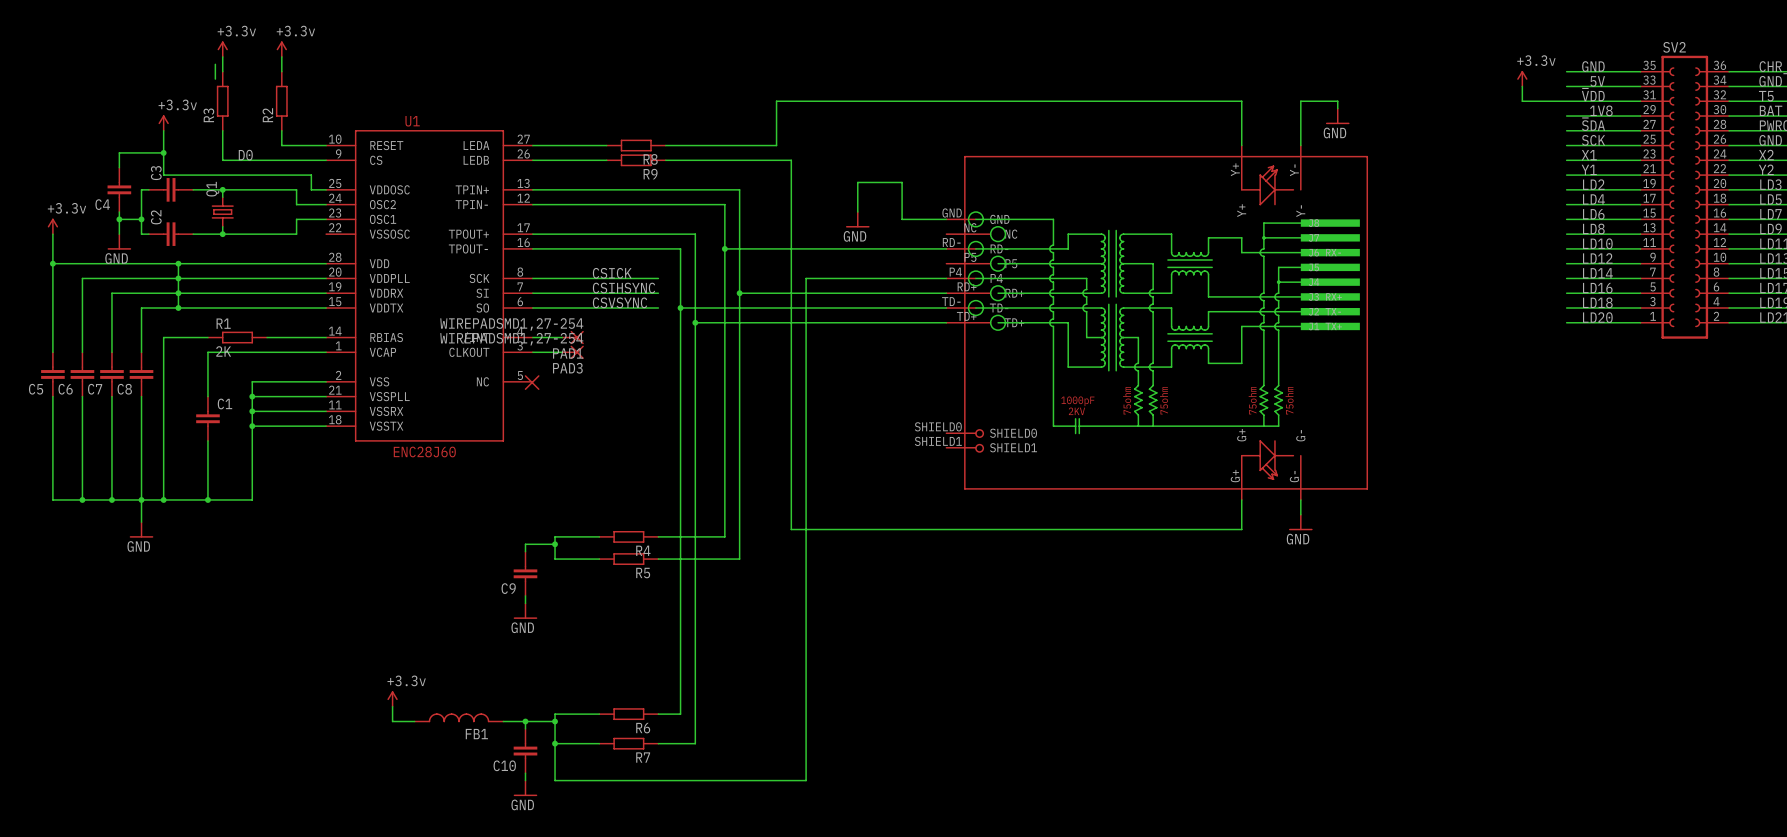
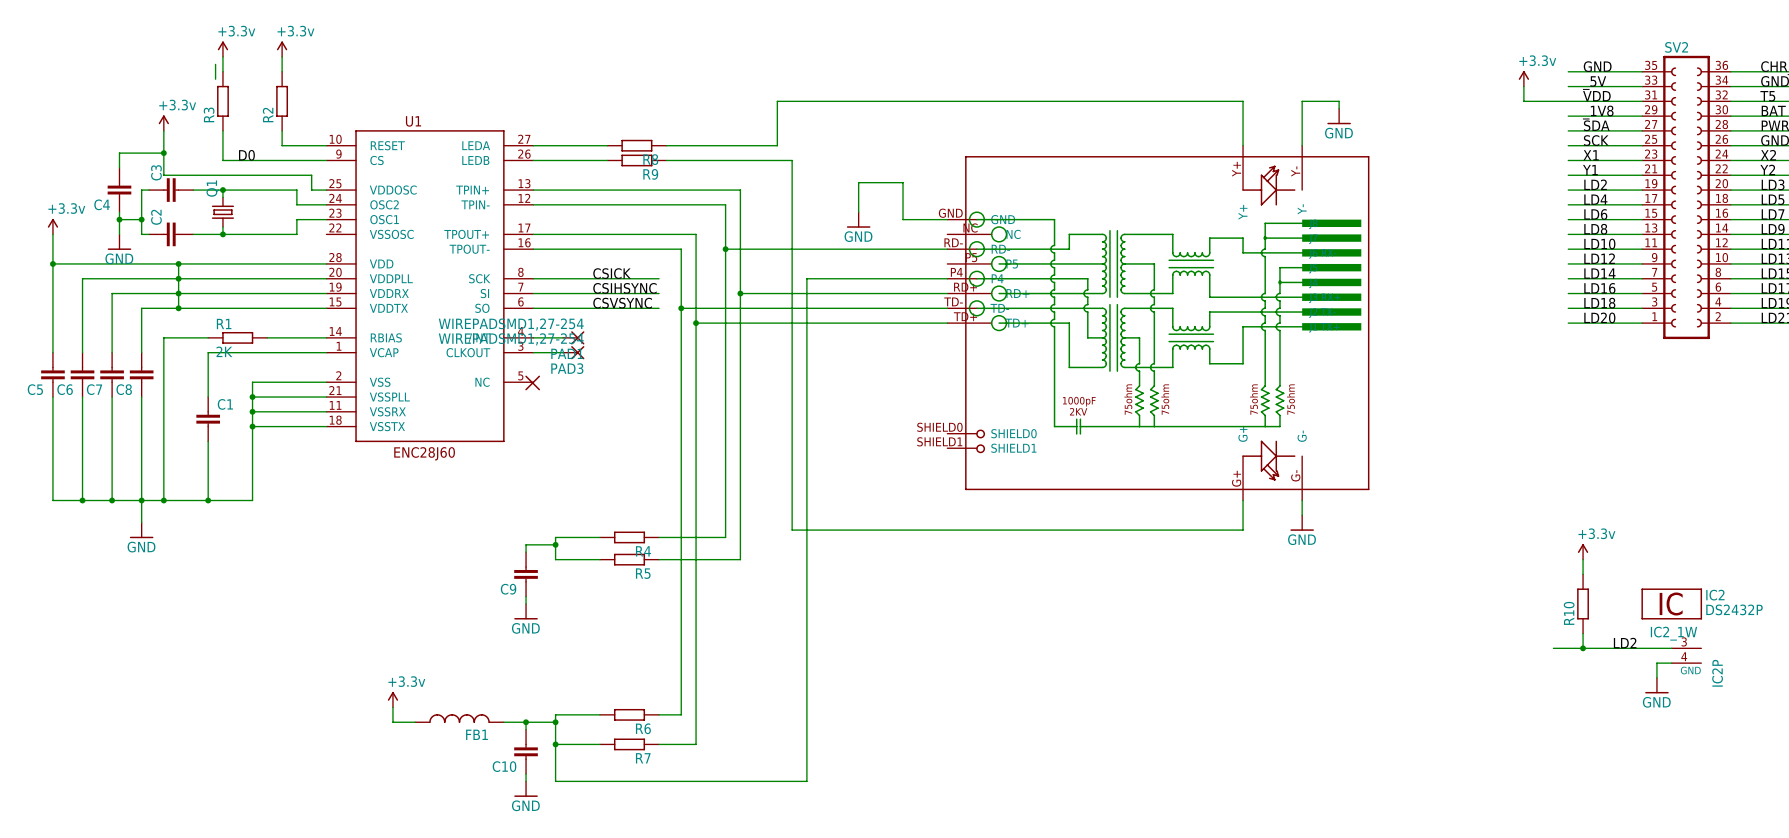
power symbol: none -> +3.3v (1583, 551)
wire: none -> (1583, 559) (1583, 574)
R10: none -> (1583, 603)
IC2: none -> DS2432P (1671, 603)
wire: none -> (1583, 633) (1583, 648)
label: none -> LD2 (1625, 643)
wire: none -> (1553, 648) (1671, 648)
junction: none -> (1583, 648)
IC2_1W: none -> (1686, 648)
wire: none -> (1671, 663) (1656, 663) (1656, 677)
IC2P: none -> (1686, 663)
power symbol: none -> GND (1656, 685)

